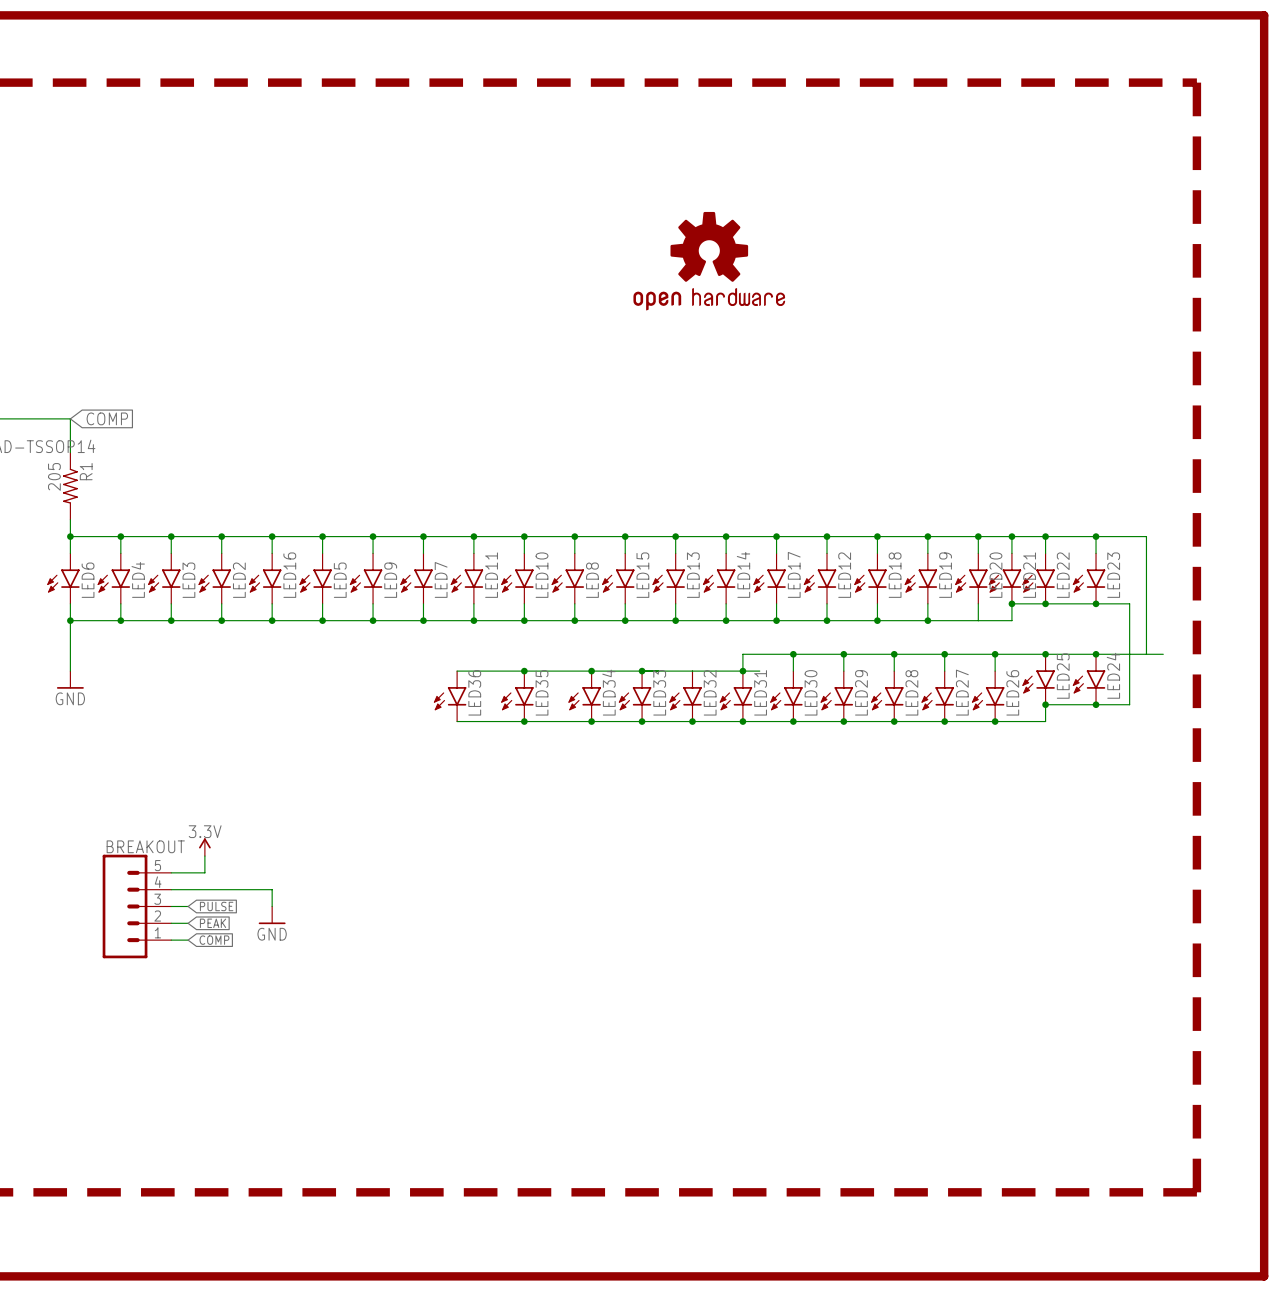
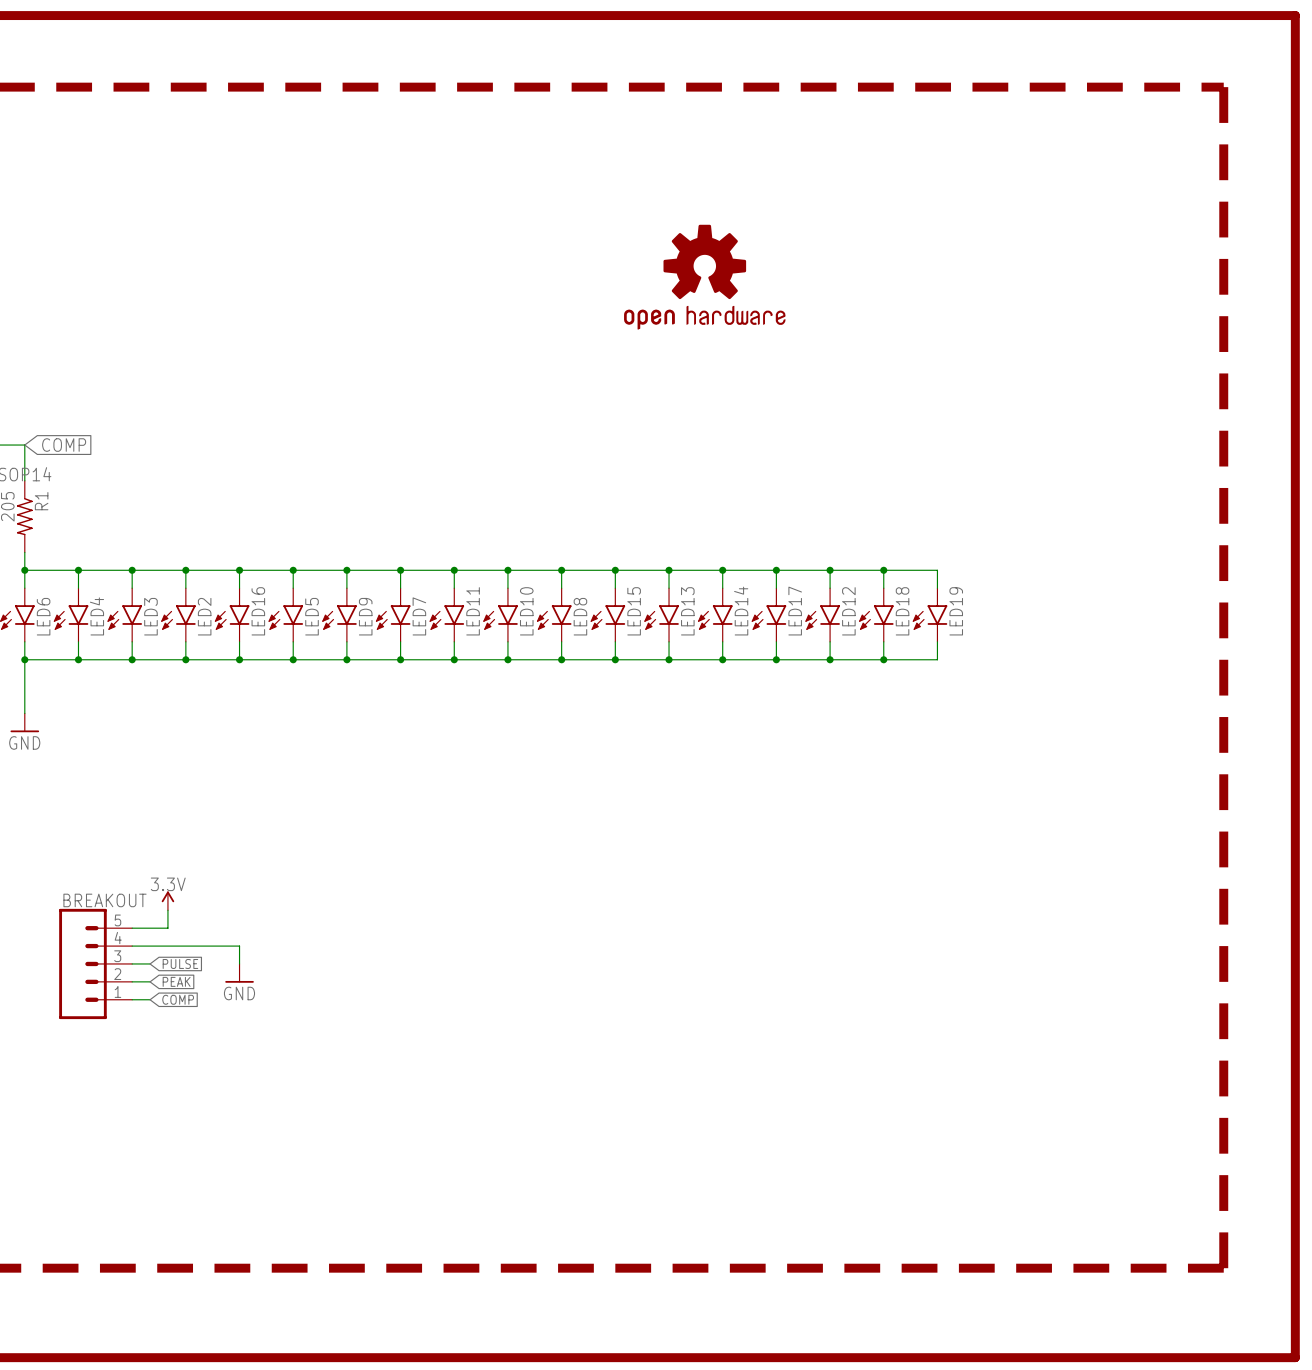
wire: (927, 536) (1146, 536) (1146, 654) -> none
junction: (927, 536) -> none
wire: (978, 536) (978, 553) -> none
junction: (978, 536) -> none
wire: (1011, 536) (1011, 553) -> none
junction: (1011, 536) -> none
wire: (1045, 536) (1045, 553) -> none
junction: (1045, 536) -> none
wire: (1096, 536) (1096, 553) -> none
junction: (1096, 536) -> none
LED20: (971, 578) -> none
LED21: (1004, 578) -> none
LED22: (1038, 578) -> none
LED23: (1089, 578) -> none
wire: (978, 603) (978, 620) -> none
junction: (1011, 603) -> none
junction: (1045, 603) -> none
junction: (1096, 603) -> none
wire: (927, 620) (1011, 620) (1011, 603) (1129, 603) (1129, 704) (1045, 704) (1045, 721) (457, 721) -> none
junction: (927, 620) -> none
wire: (793, 654) (793, 671) -> none
junction: (793, 654) -> none
wire: (843, 654) (843, 671) -> none
junction: (843, 654) -> none
wire: (894, 654) (894, 671) -> none
junction: (894, 654) -> none
wire: (944, 654) (944, 671) -> none
junction: (944, 654) -> none
wire: (995, 654) (995, 671) -> none
junction: (995, 654) -> none
junction: (1045, 654) -> none
junction: (1096, 654) -> none
wire: (1163, 654) (742, 654) (742, 671) -> none
wire: (457, 671) (759, 671) -> none
junction: (524, 671) -> none
junction: (591, 671) -> none
junction: (642, 671) -> none
junction: (742, 671) -> none
LED25: (1038, 679) -> none
LED24: (1089, 679) -> none
LED36: (450, 696) -> none
LED35: (517, 696) -> none
LED34: (584, 696) -> none
LED33: (635, 696) -> none
LED32: (685, 696) -> none
LED31: (735, 696) -> none
LED30: (786, 696) -> none
LED29: (836, 696) -> none
LED28: (887, 696) -> none
LED27: (937, 696) -> none
LED26: (988, 696) -> none
junction: (1045, 704) -> none
junction: (1096, 704) -> none
junction: (524, 721) -> none
junction: (591, 721) -> none
junction: (642, 721) -> none
junction: (692, 721) -> none
junction: (742, 721) -> none
junction: (793, 721) -> none
junction: (843, 721) -> none
junction: (894, 721) -> none
junction: (944, 721) -> none
junction: (995, 721) -> none

